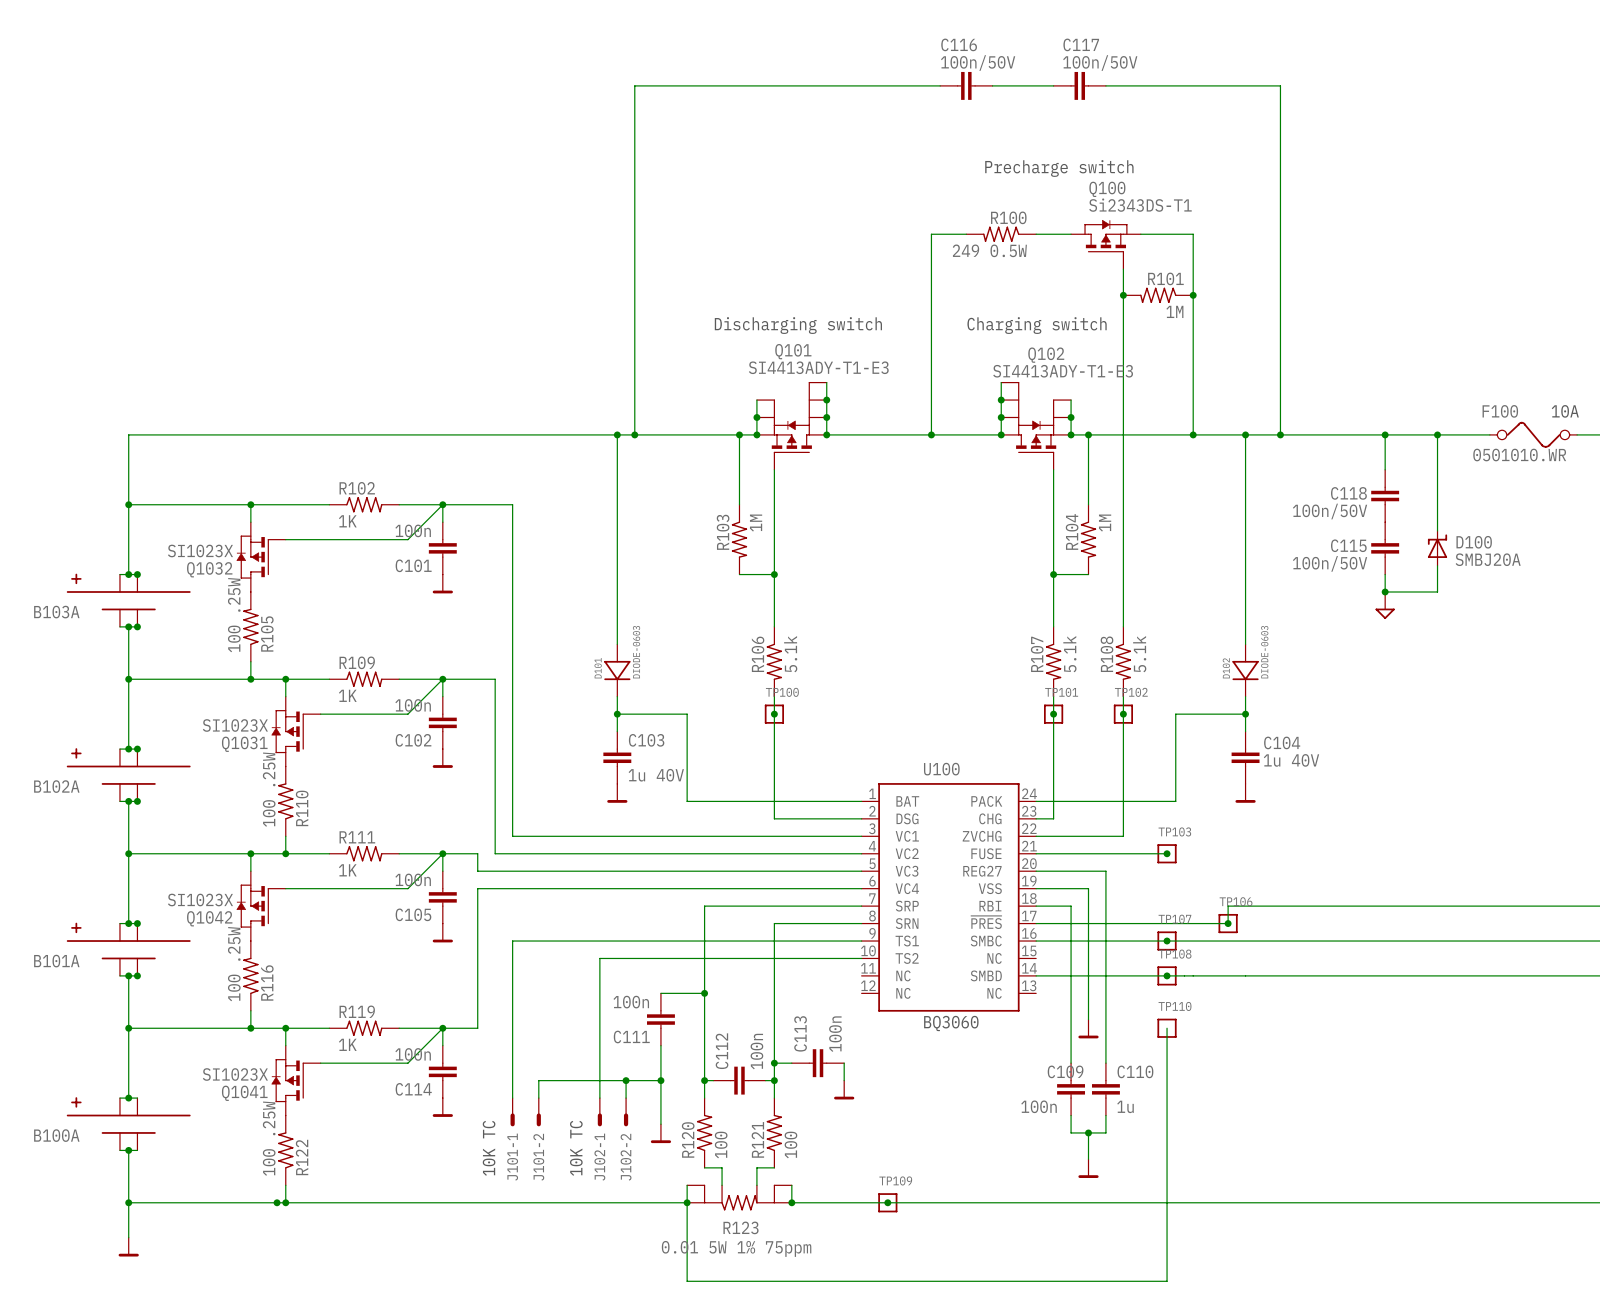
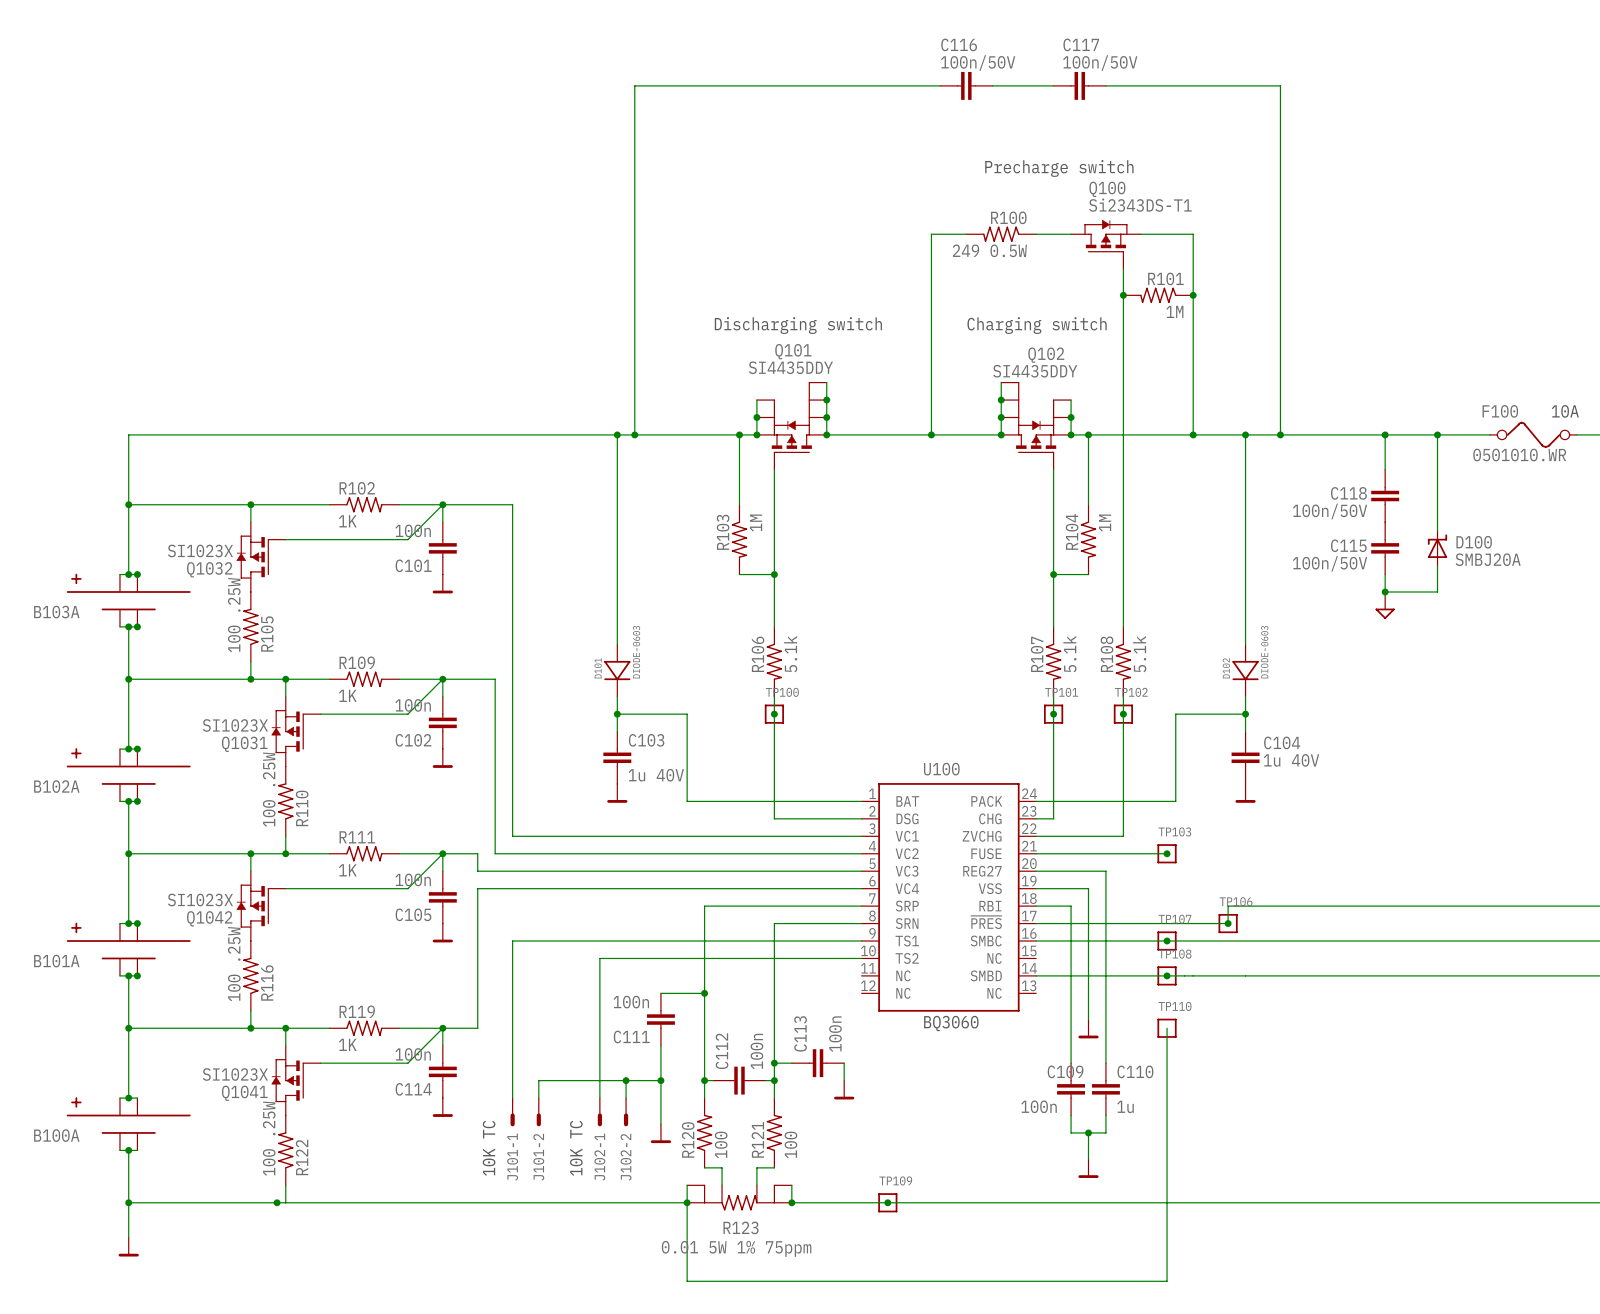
Q101 value: SI4413ADY-T1-E3 (818, 367) -> SI4435DDY (790, 367)
Q102 value: SI4413ADY-T1-E3 (1063, 371) -> SI4435DDY (1035, 371)
junction: (285, 1202) -> none

